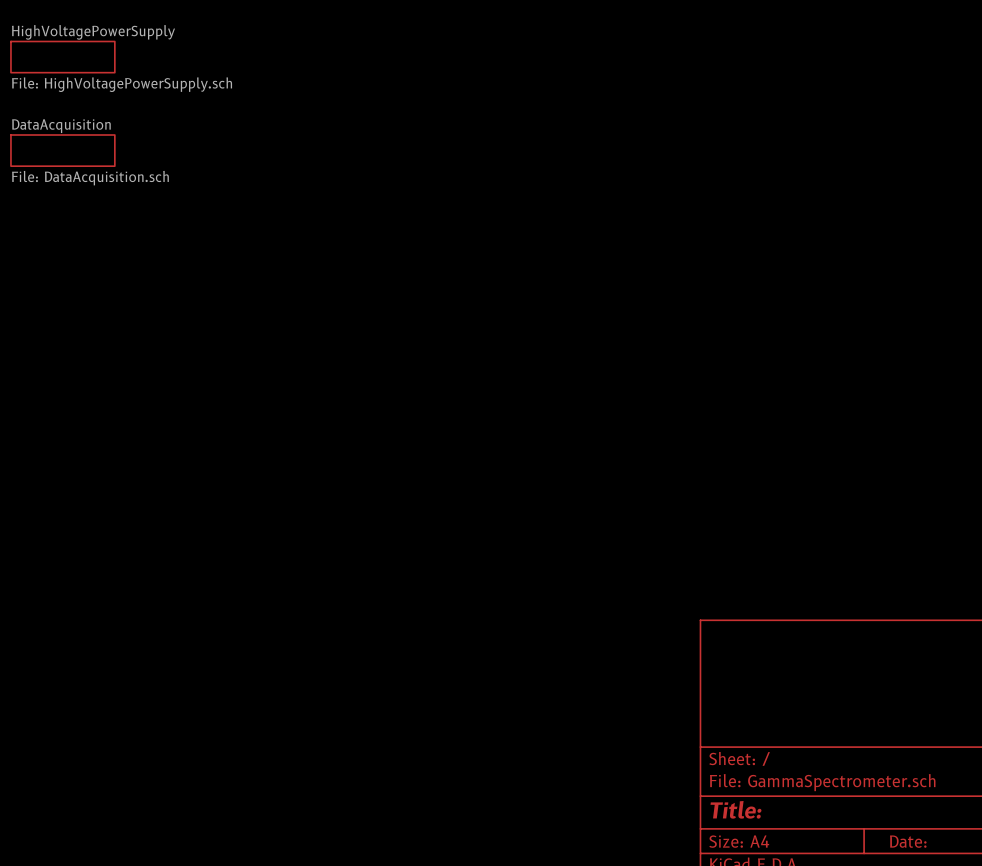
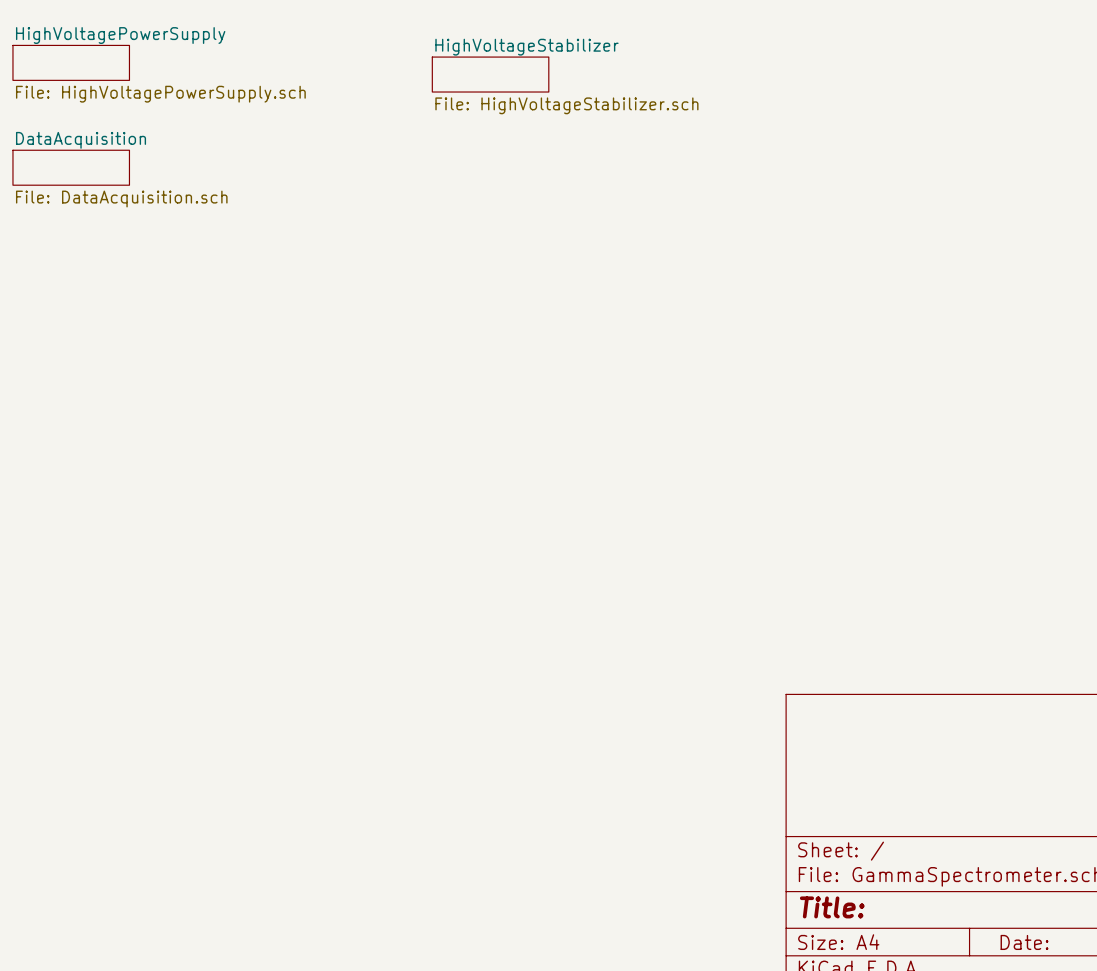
sheet HighVoltageStabilizer: none -> File: HighVoltageStabilizer.sch (490, 74)

